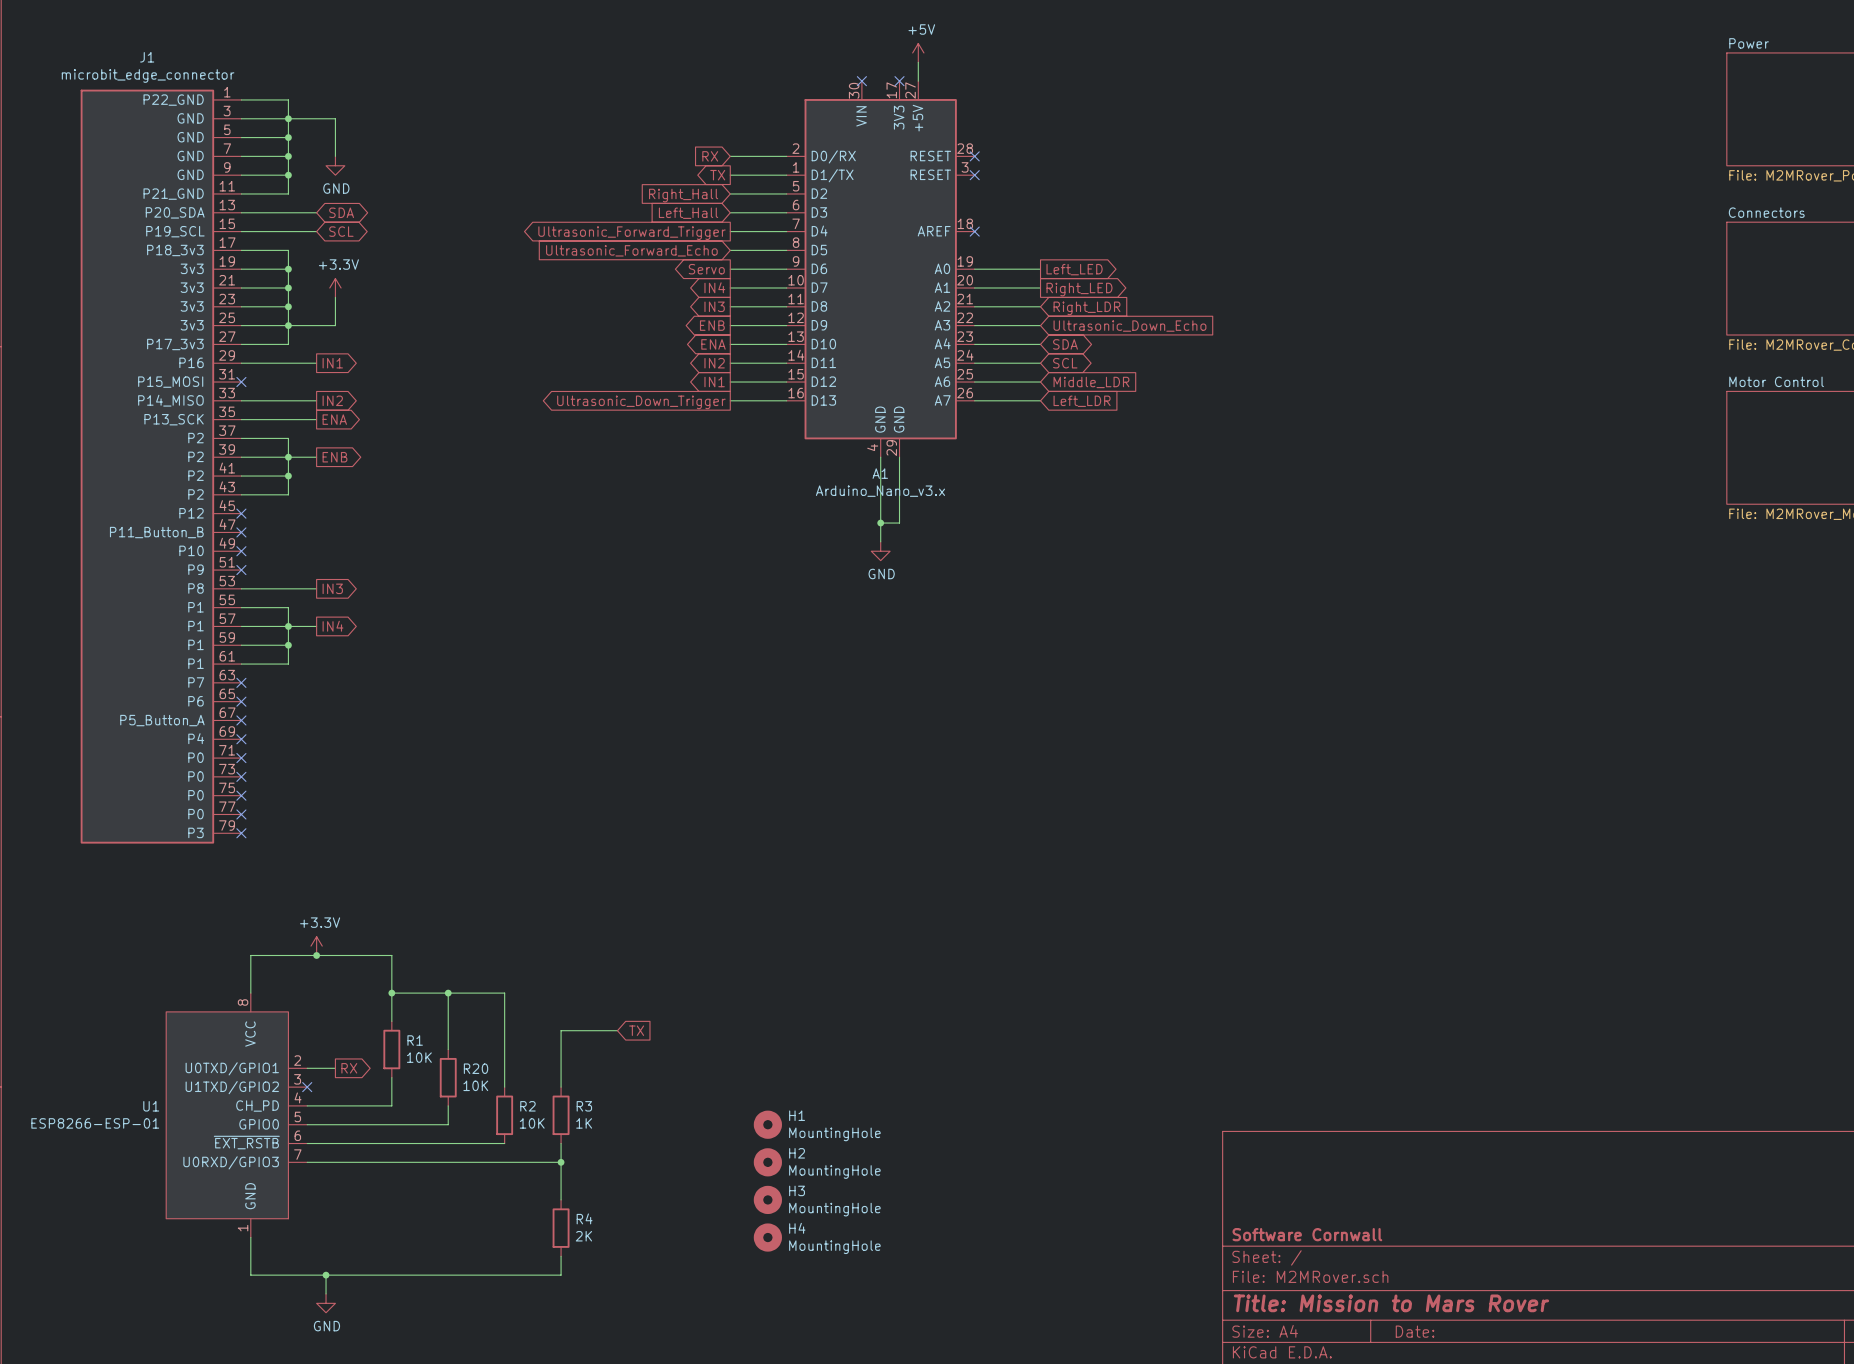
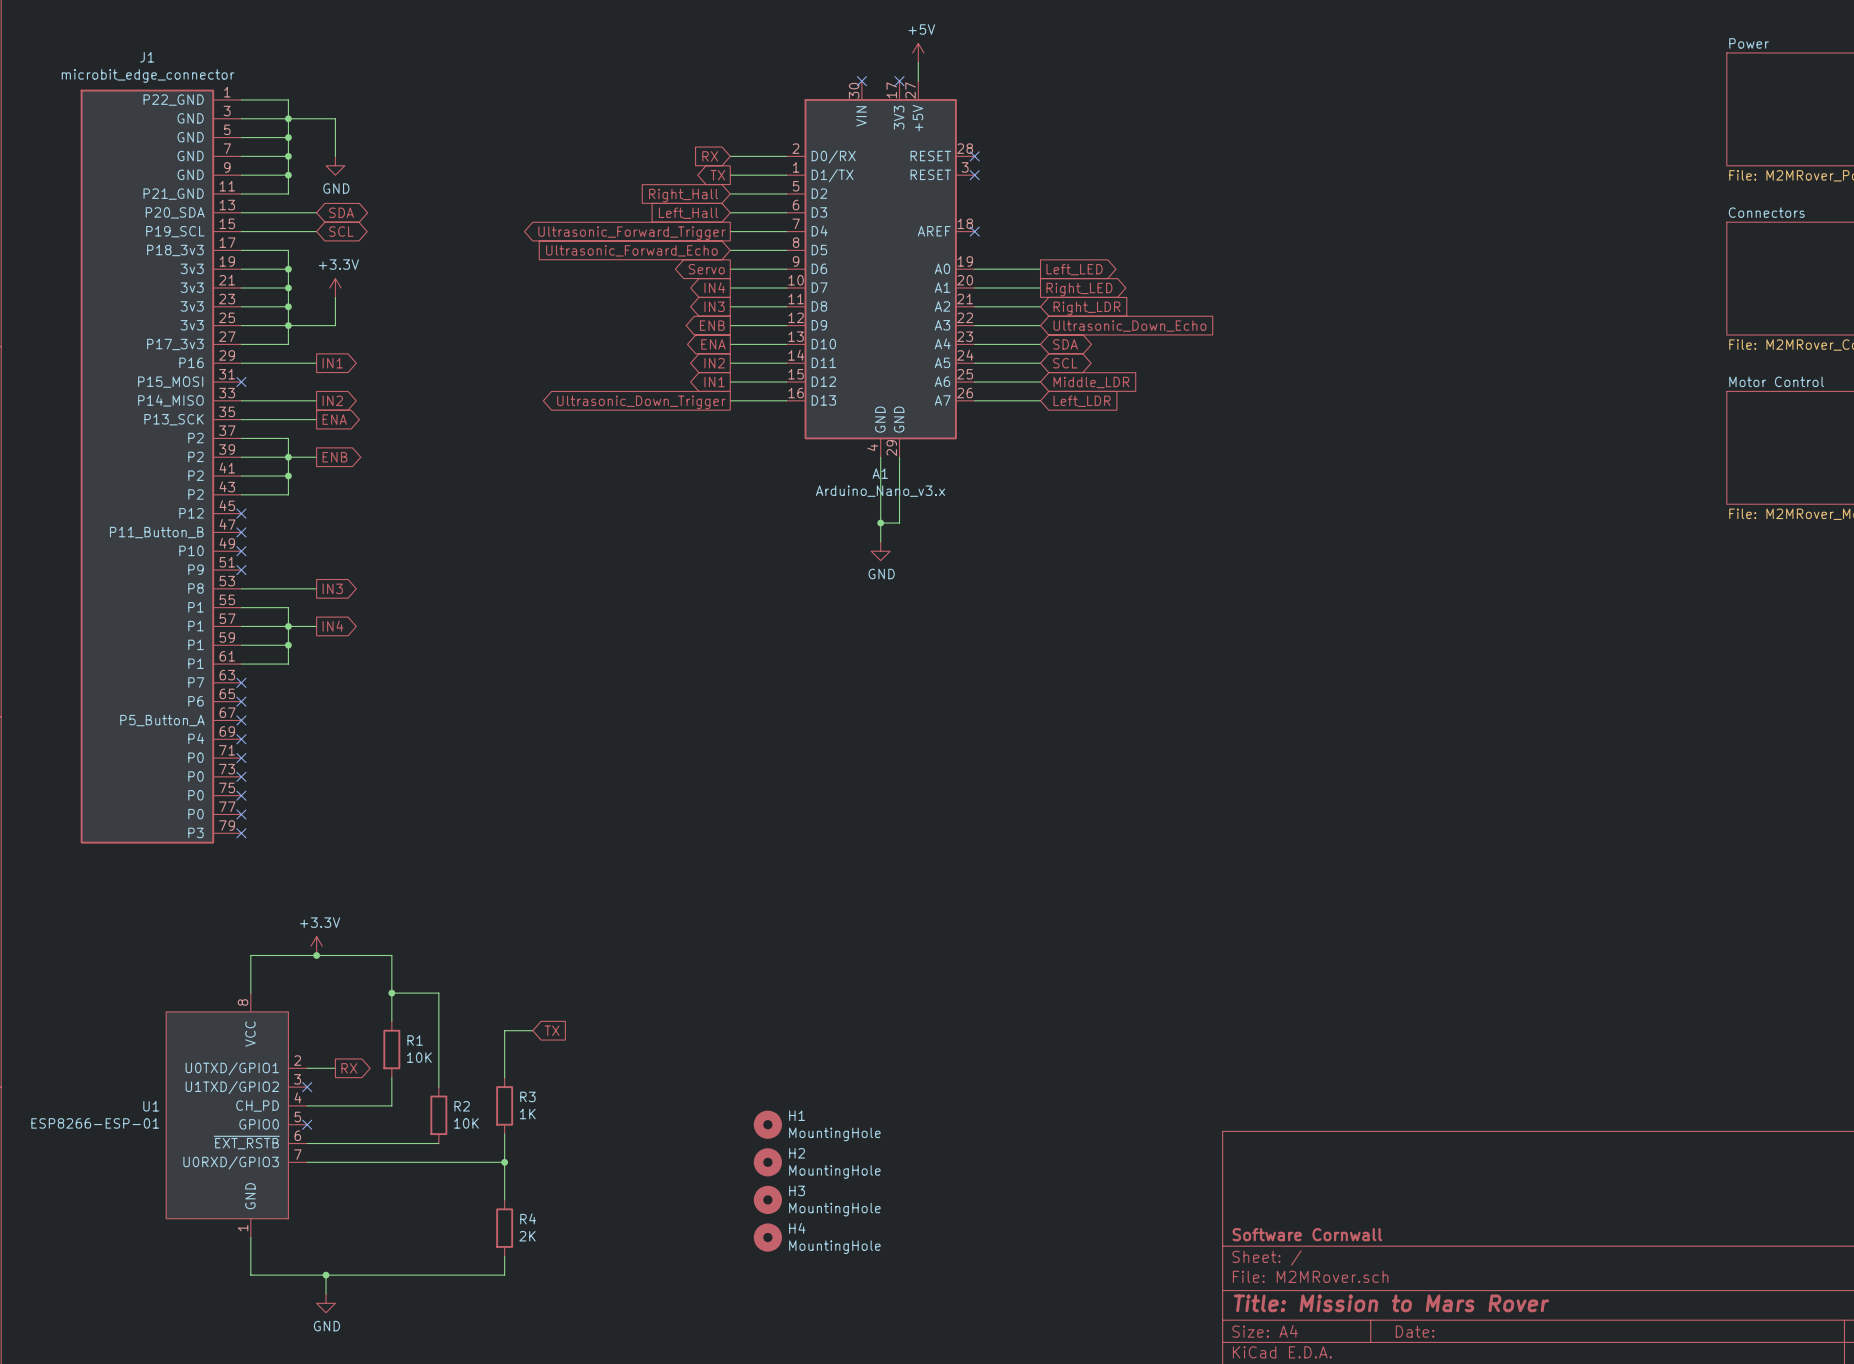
wire: (438, 993) (504, 993) (504, 1030) -> (438, 993) (438, 1087)
wire: (448, 993) (448, 1049) -> none
junction: (448, 993) -> none
wire: none -> (504, 1030) (532, 1030)
wire: (617, 1030) (561, 1030) (561, 1087) -> none
global label position: TX (636, 1030) -> TX (552, 1030)
R20: 10K (448, 1077) -> none
wire: (448, 1105) (448, 1124) (307, 1124) -> none
R2 position: (504, 1115) -> (438, 1115)
R3 position: (561, 1115) -> (504, 1105)
no-connect mark: none -> (307, 1124)
wire: none -> (504, 1134) (504, 1199)
wire: (438, 1143) (504, 1143) -> none
wire: (561, 1143) (561, 1199) -> none
wire: (504, 1162) (561, 1162) -> none
junction: none -> (504, 1162)
junction: (561, 1162) -> none
R4 position: (561, 1228) -> (504, 1228)
wire: (561, 1256) (561, 1275) (504, 1275) -> (504, 1256) (504, 1275)

